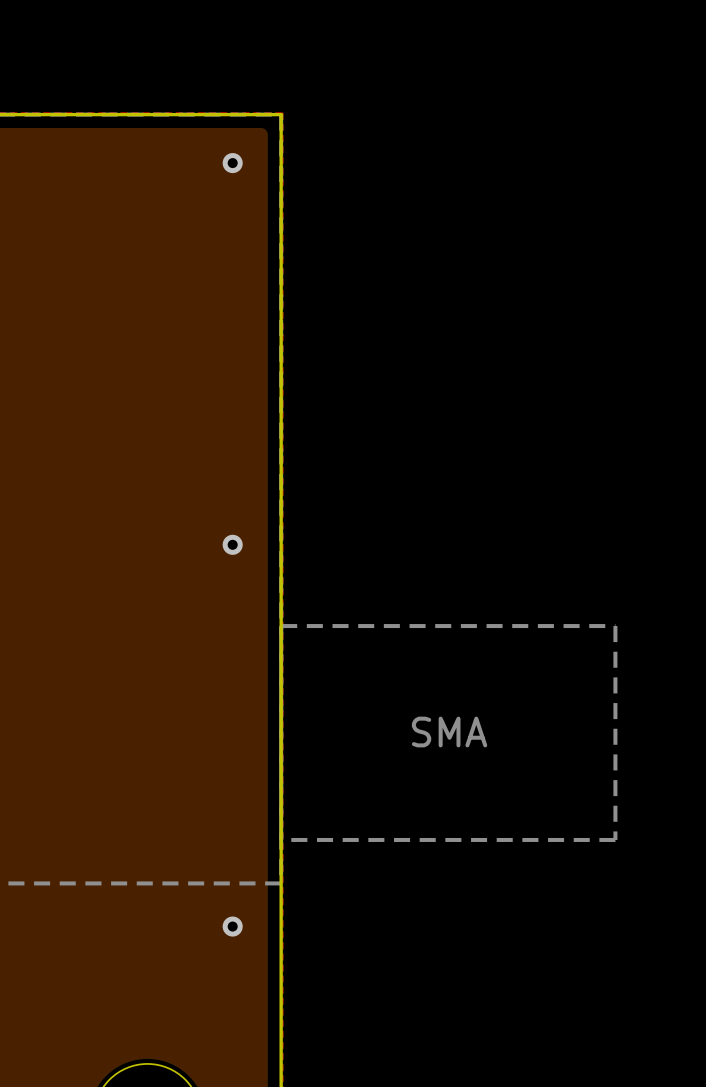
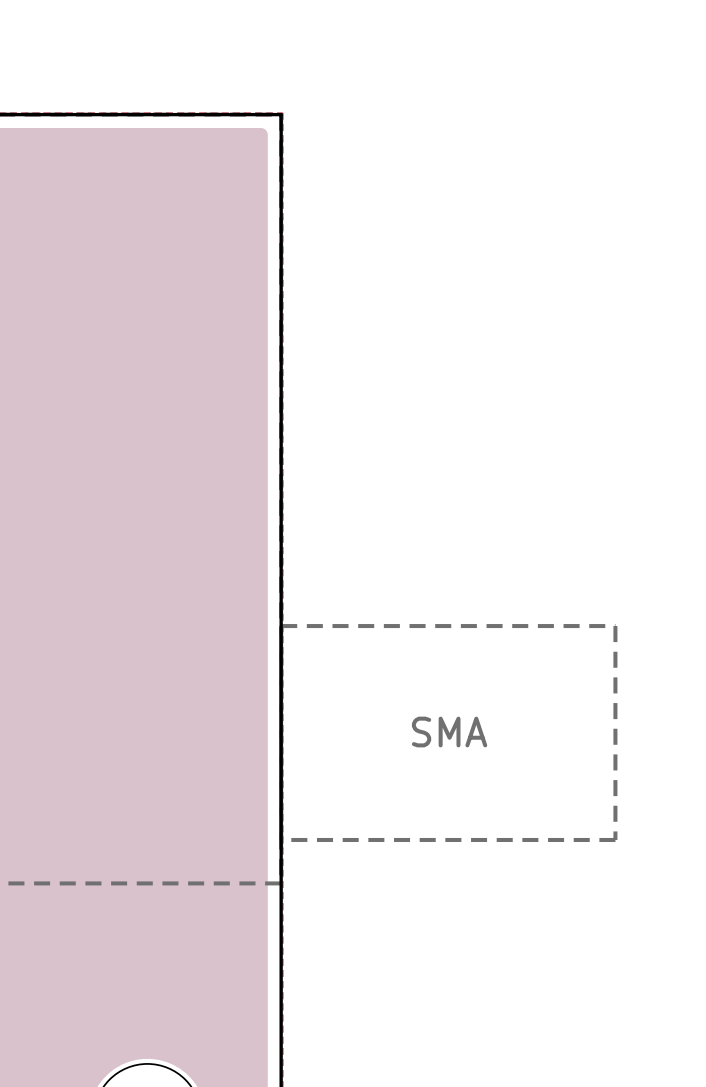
via: (232, 163) -> none
via: (232, 544) -> none
via: (232, 926) -> none

